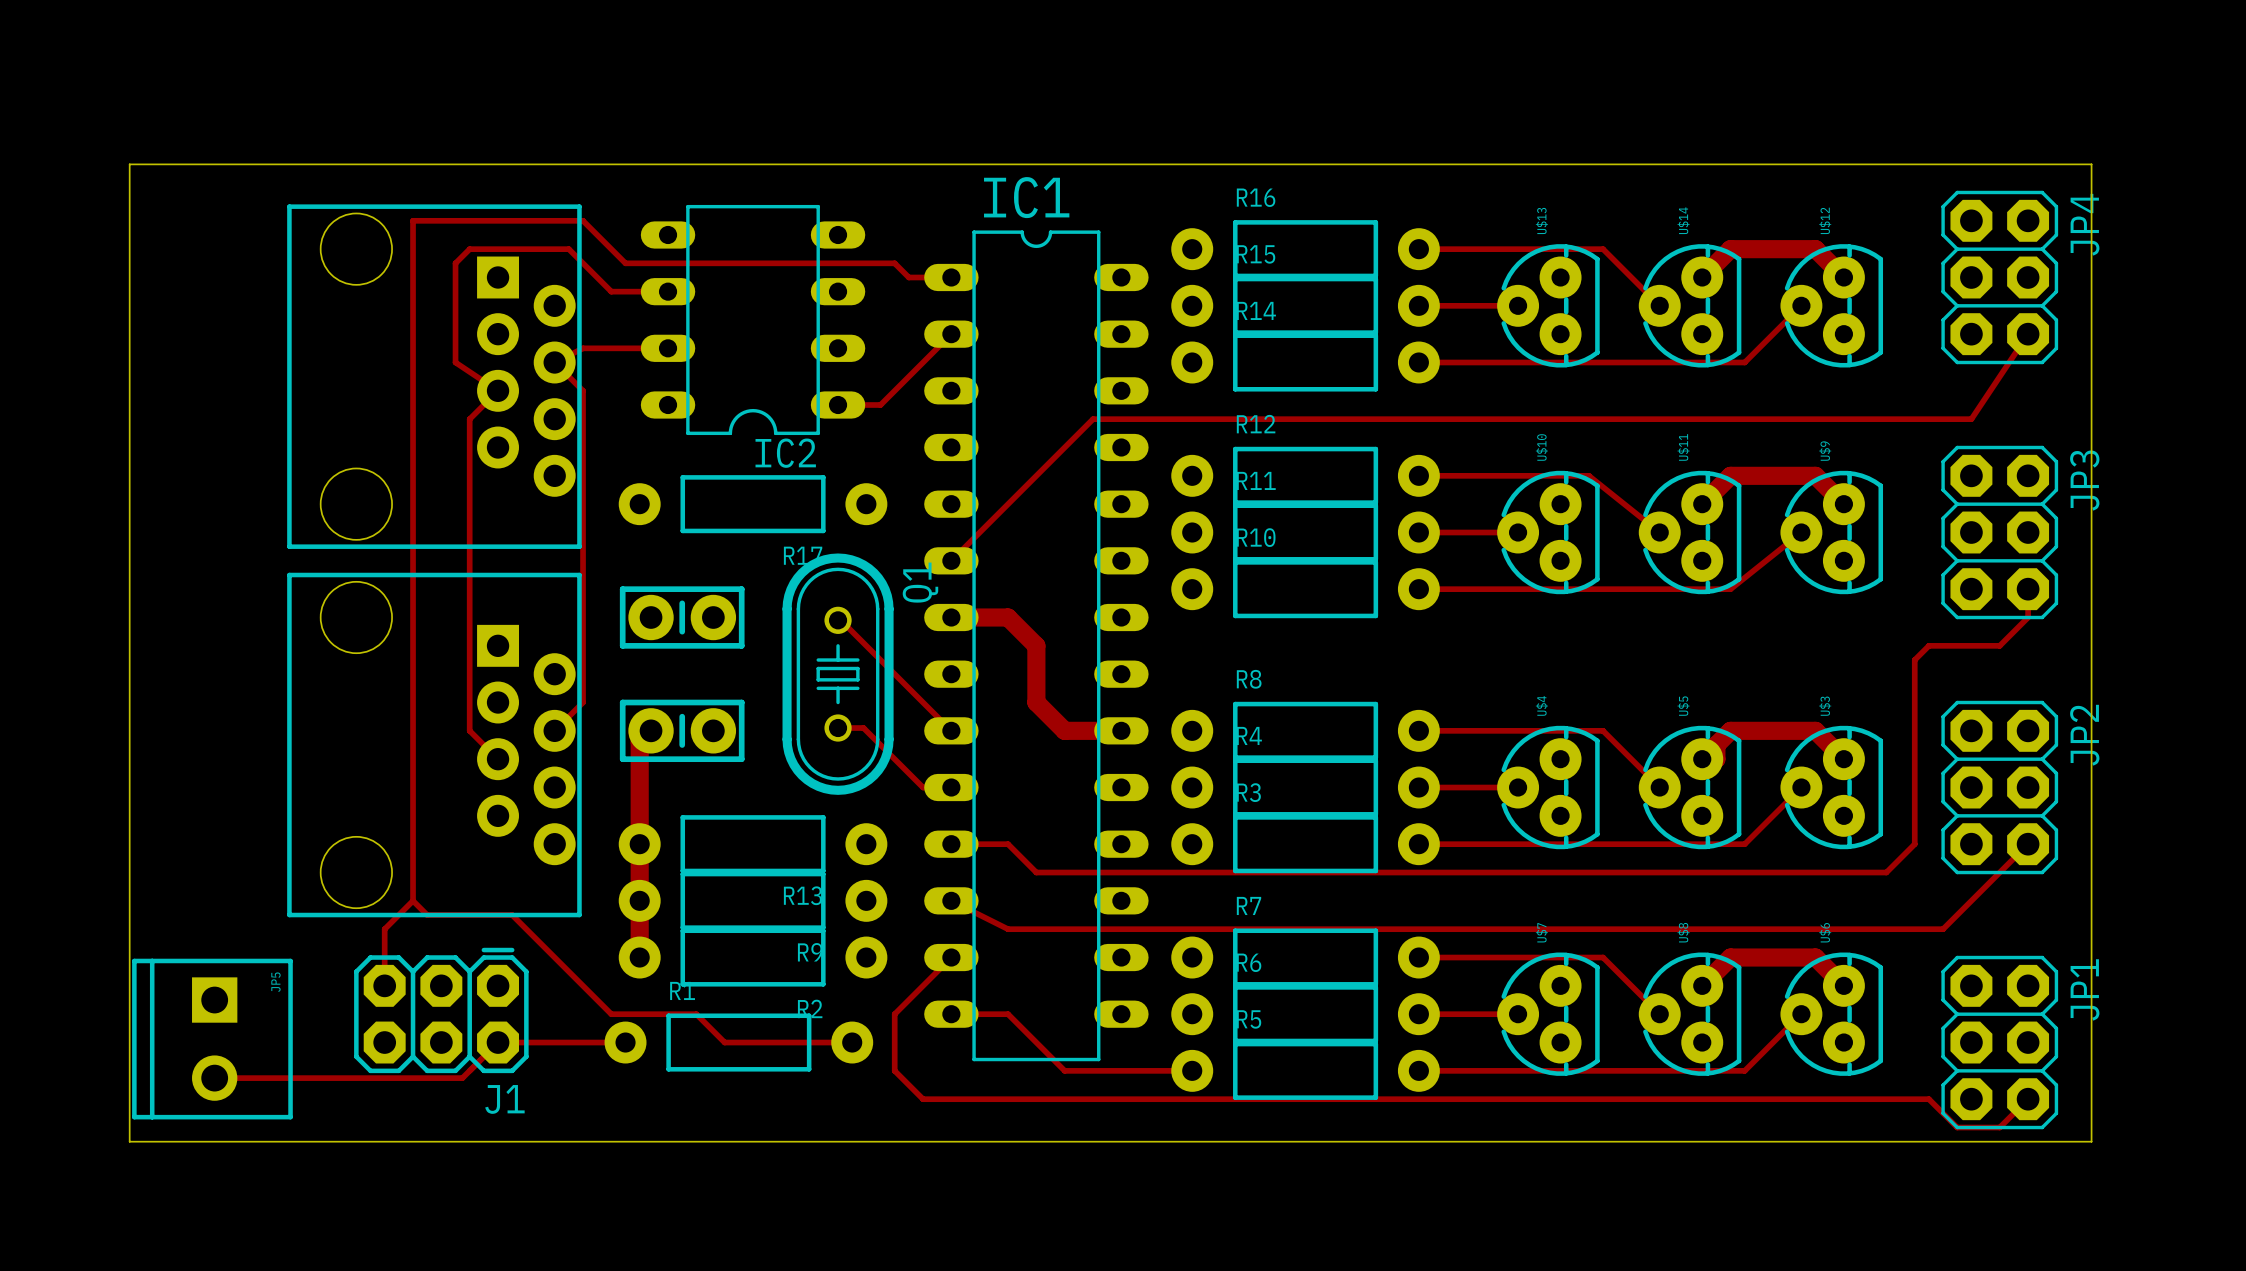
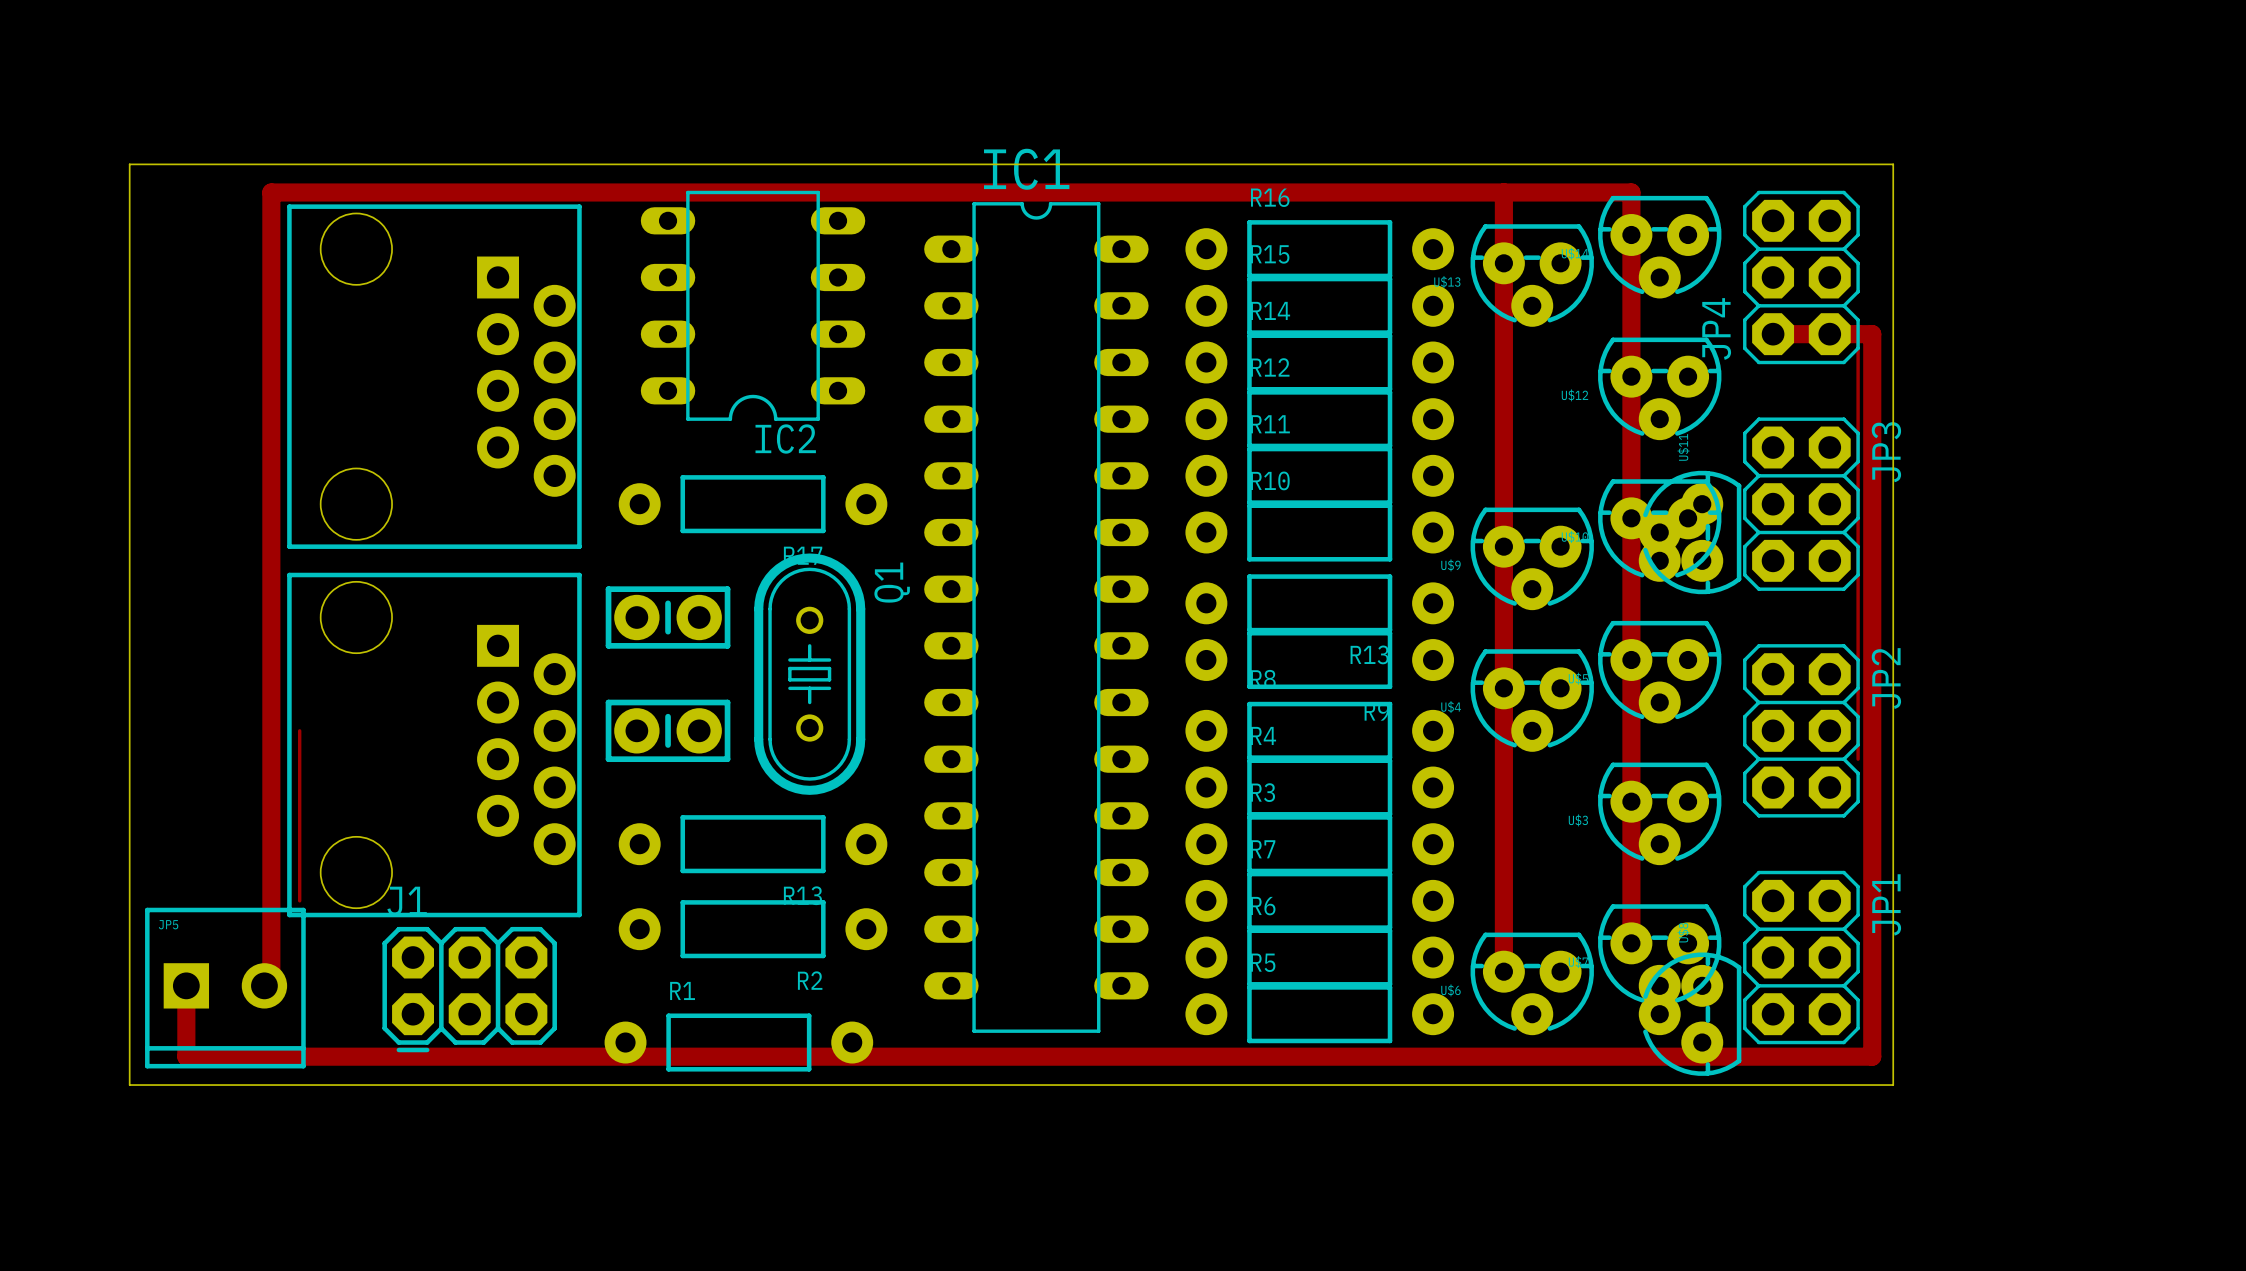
board edge: (1893, 164) (2091, 164) (2091, 1141) (129, 1141) (129, 1085) -> (1893, 164) (1893, 1085) (129, 1085)
track: none -> (1503, 192) (1503, 971)
U$13 name position: U$13 (1541, 220) -> U$13 (1447, 282)
JP4 name position: JP4 (2085, 224) -> JP4 (1716, 328)
U$13 footprint: [1497, 244, 1600, 368] -> [1470, 224, 1594, 327]
R16 position: (1305, 249) -> (1319, 249)
track: (1418, 249) (1603, 249) (1659, 305) -> none
track: (951, 277) (908, 277) (894, 263) (625, 263) (583, 220) (413, 220) (413, 900) -> none
track: (1702, 277) (1730, 249) (1815, 249) (1843, 277) -> none
JP4 position: (1999, 277) -> (1801, 277)
track: (668, 291) (611, 291) (568, 249) (469, 249) (455, 263) (455, 362) (498, 390) (469, 419) (469, 730) (498, 759) -> none
R15 position: (1305, 305) -> (1319, 305)
track: (1418, 305) (1518, 305) -> none
U$14 rotation: 0° (1690, 305) -> 90° counterclockwise (1659, 247)
track: (1801, 305) (1744, 362) (1418, 362) -> none
U$12 rotation: 0° (1831, 305) -> 90° counterclockwise (1659, 388)
U$12 position: (1831, 305) -> (1659, 388)
IC2 position: (753, 319) -> (753, 305)
track: (951, 334) (880, 405) (838, 405) -> none
track: none -> (1773, 334) (1872, 334) (1872, 1056) (186, 1056) (186, 985)
track: none -> (1858, 334) (1858, 759)
track: (2028, 334) (1971, 419) (1093, 419) (951, 560) -> none
track: (668, 348) (583, 348) (554, 362) (583, 390) (583, 702) (554, 730) -> none
R14 position: (1305, 362) -> (1319, 362)
U$9 name position: U$9 (1825, 451) -> U$9 (1450, 565)
U$9 footprint: [1780, 470, 1884, 595] -> [1470, 507, 1594, 611]
R12 position: (1305, 475) -> (1319, 419)
track: (1418, 475) (1588, 475) (1659, 532) -> none
track: (1702, 504) (1730, 475) (1815, 475) (1843, 504) -> none
R11 position: (1305, 532) -> (1319, 475)
track: (1418, 532) (1518, 532) -> none
U$10 rotation: 0° (1548, 532) -> 90° counterclockwise (1659, 530)
U$10 position: (1548, 532) -> (1659, 530)
track: (1801, 532) (1730, 589) (1418, 589) -> none
JP3 position: (1999, 532) -> (1801, 504)
R10 position: (1305, 589) -> (1319, 532)
track: (2028, 589) (2028, 617) (1999, 645) (1928, 645) (1914, 660) (1914, 844) (1886, 872) (1036, 872) (1008, 844) (951, 844) -> none
R13: none -> (1319, 603)
part position: (682, 617) -> (668, 617)
track: (951, 617) (1008, 617) (1036, 645) (1036, 702) (1064, 730) (1121, 730) -> none
track: (838, 620) (840, 620) (951, 730) -> none
IC1 position: (1036, 645) -> (1036, 617)
Q1 position: (838, 674) -> (809, 674)
U$4 name position: U$4 (1541, 705) -> U$4 (1451, 707)
U$4 footprint: [1497, 725, 1600, 850] -> [1470, 649, 1594, 752]
track: (838, 728) (863, 728) (923, 787) (951, 787) -> none
track: none -> (299, 730) (299, 900)
track: (651, 730) (639, 742) (639, 957) -> none
part position: (682, 730) -> (668, 730)
R8 position: (1305, 730) -> (1319, 730)
track: (1418, 730) (1603, 730) (1659, 787) -> none
track: (1702, 759) (1716, 759) (1716, 745) (1730, 730) (1815, 730) (1843, 759) -> none
R4 position: (1305, 787) -> (1319, 787)
track: (1418, 787) (1518, 787) -> none
U$5 rotation: 0° (1690, 787) -> 90° counterclockwise (1659, 672)
U$5 position: (1690, 787) -> (1659, 672)
track: (1801, 787) (1744, 844) (1418, 844) -> none
U$3 rotation: 0° (1831, 787) -> 90° counterclockwise (1659, 813)
U$3 position: (1831, 787) -> (1659, 813)
JP2 position: (1999, 787) -> (1801, 730)
R3 position: (1305, 844) -> (1319, 844)
track: (2028, 844) (1943, 929) (1008, 929) (951, 900) -> none
track: (413, 900) (384, 929) (384, 985) -> none
track: (413, 900) (427, 915) (512, 915) (611, 1014) (696, 1014) (724, 1042) (852, 1042) -> none
R9 position: (753, 900) -> (1319, 660)
U$6 name position: U$6 (1825, 932) -> U$6 (1450, 990)
track: none -> (1631, 943) (1631, 192) (271, 192) (271, 985) (264, 985)
U$6 footprint: [1780, 952, 1884, 1076] -> [1470, 932, 1594, 1036]
R2 position: (753, 957) -> (753, 929)
track: (951, 957) (894, 1014) (894, 1070) (923, 1099) (1928, 1099) (1957, 1127) (1999, 1127) (2028, 1099) -> none
R7 position: (1305, 957) -> (1319, 900)
track: (1418, 957) (1603, 957) (1659, 1014) -> none
track: (1702, 985) (1730, 957) (1815, 957) (1843, 985) -> none
J1 rotation: 0° (441, 1010) -> 180° (469, 989)
track: (951, 1014) (1008, 1014) (1064, 1070) (1192, 1070) -> none
R6 position: (1305, 1014) -> (1319, 957)
track: (1418, 1014) (1518, 1014) -> none
U$7 rotation: 0° (1548, 1014) -> 90° counterclockwise (1659, 955)
U$7 position: (1548, 1014) -> (1659, 955)
track: (1801, 1014) (1744, 1070) (1418, 1070) -> none
JP5 rotation: 0° (212, 1039) -> 90° counterclockwise (225, 988)
track: (625, 1042) (498, 1042) (462, 1078) (214, 1078) -> none
JP1 position: (1999, 1042) -> (1801, 957)
R5 position: (1305, 1070) -> (1319, 1014)

